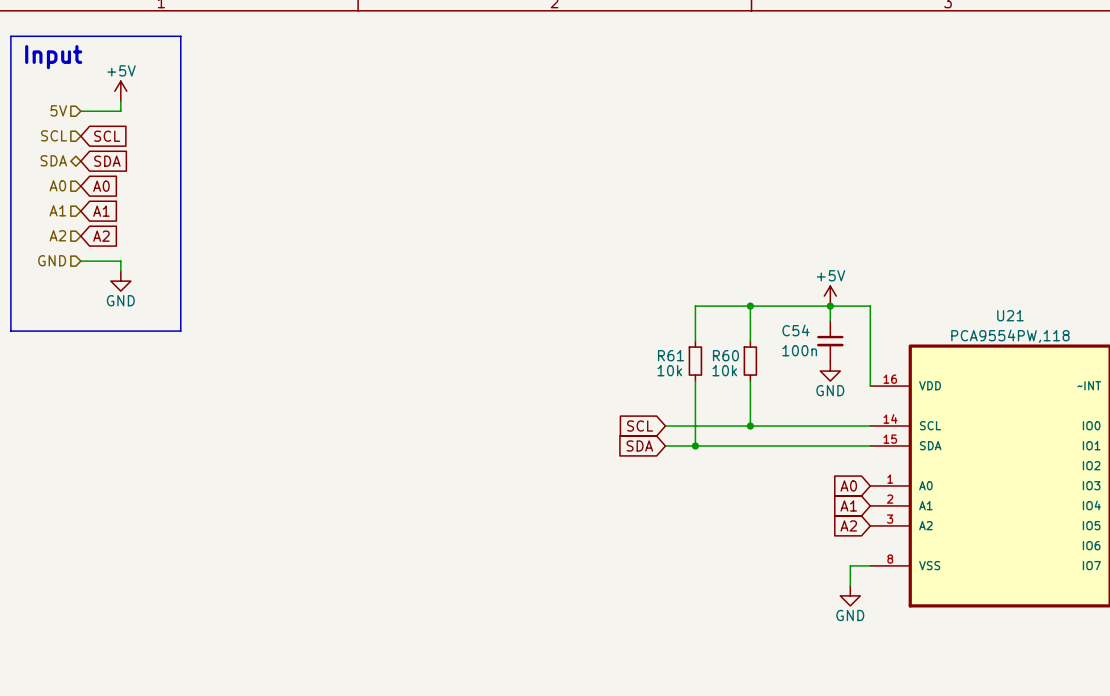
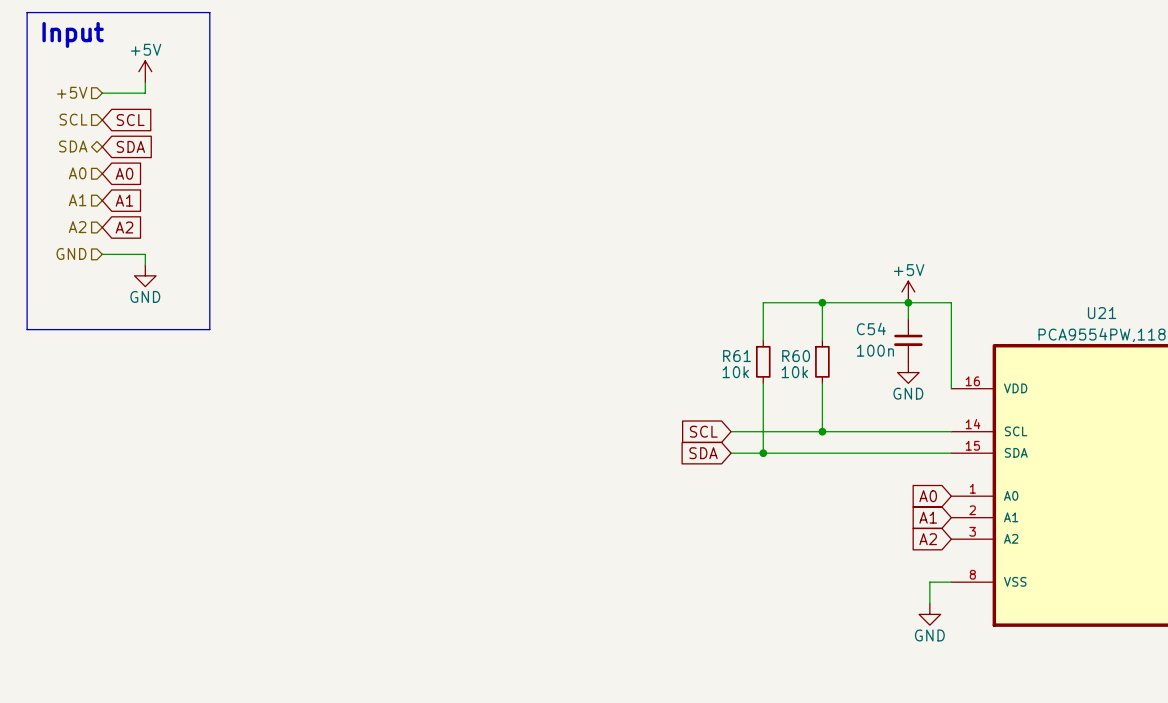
hierarchical label: 5V (58, 110) -> +5V (72, 92)

